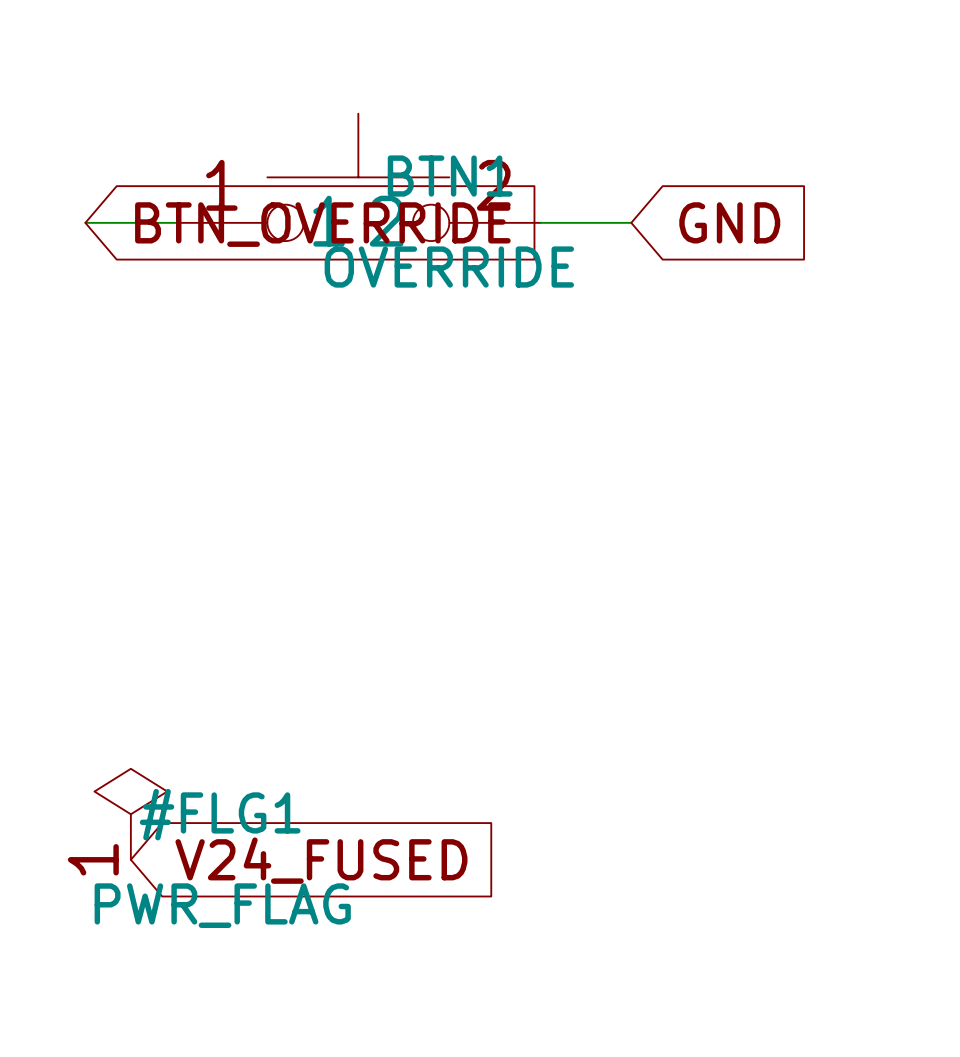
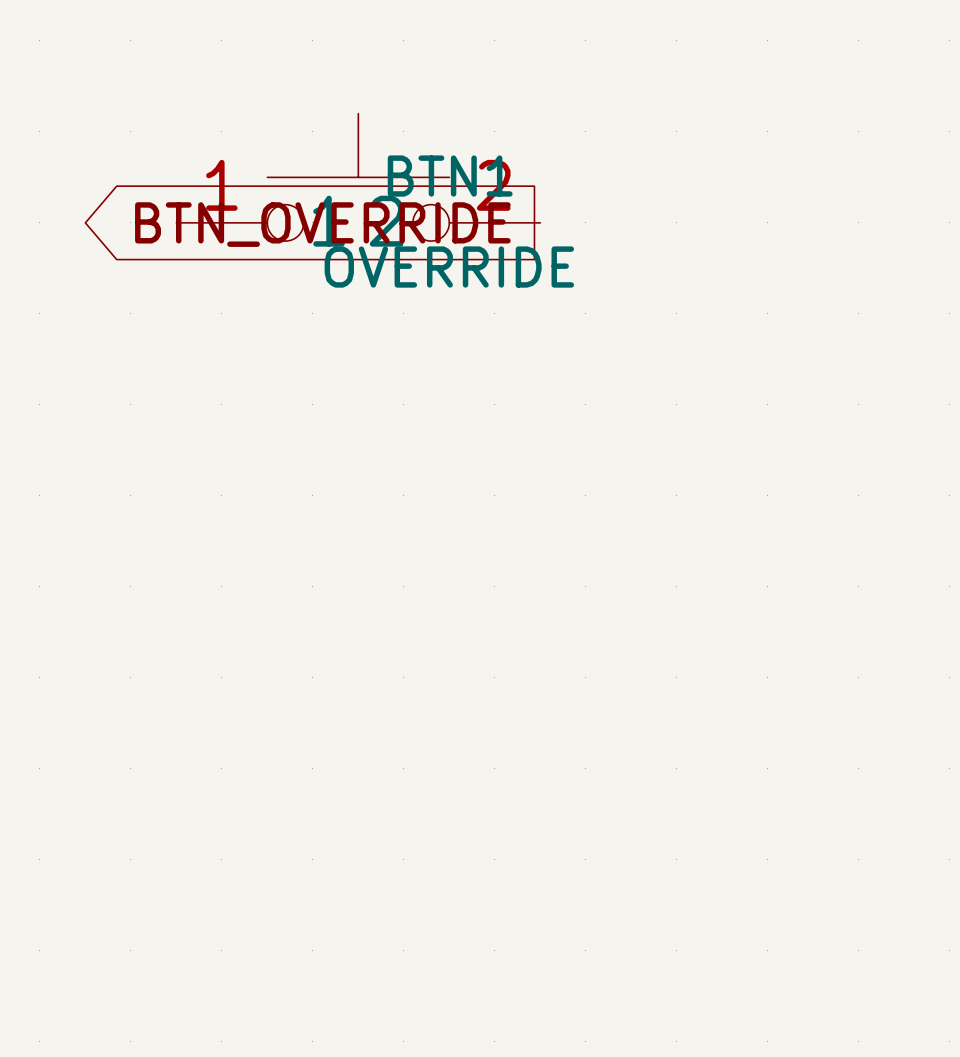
wire: (85, 222) (176, 222) -> none
wire: (540, 222) (631, 222) -> none
global label: GND (729, 222) -> none
#FLG1: PWR_FLAG (130, 814) -> none
global label: V24_FUSED (321, 860) -> none

